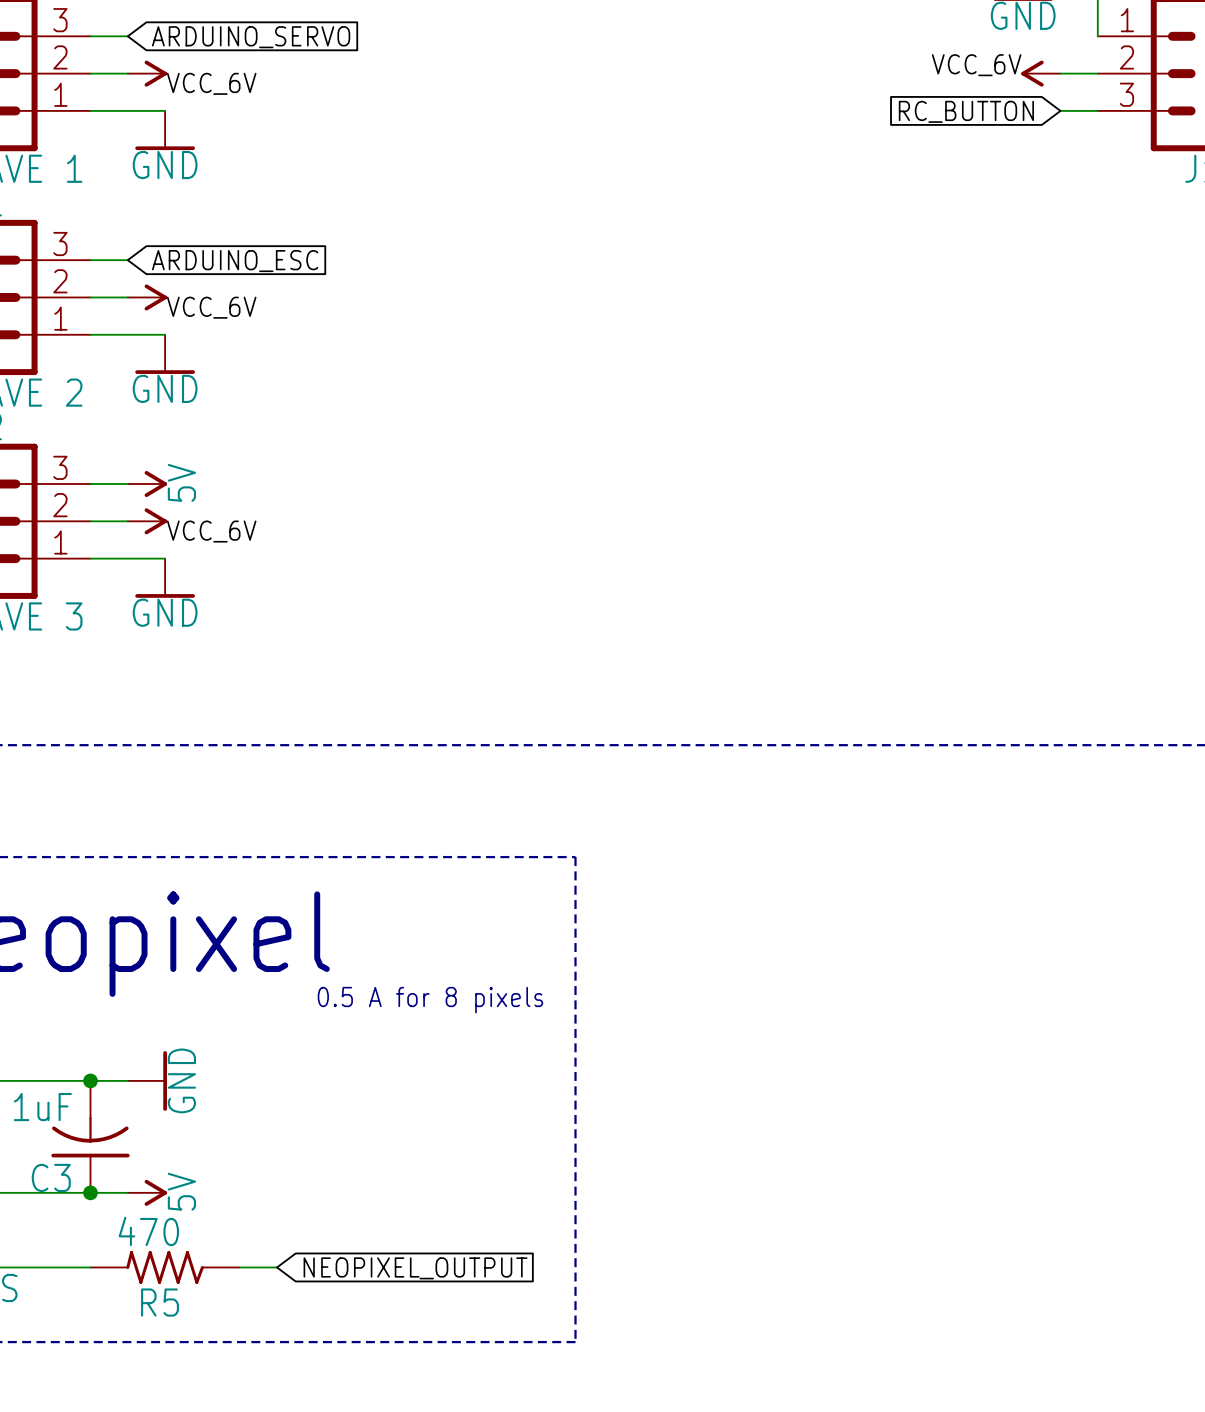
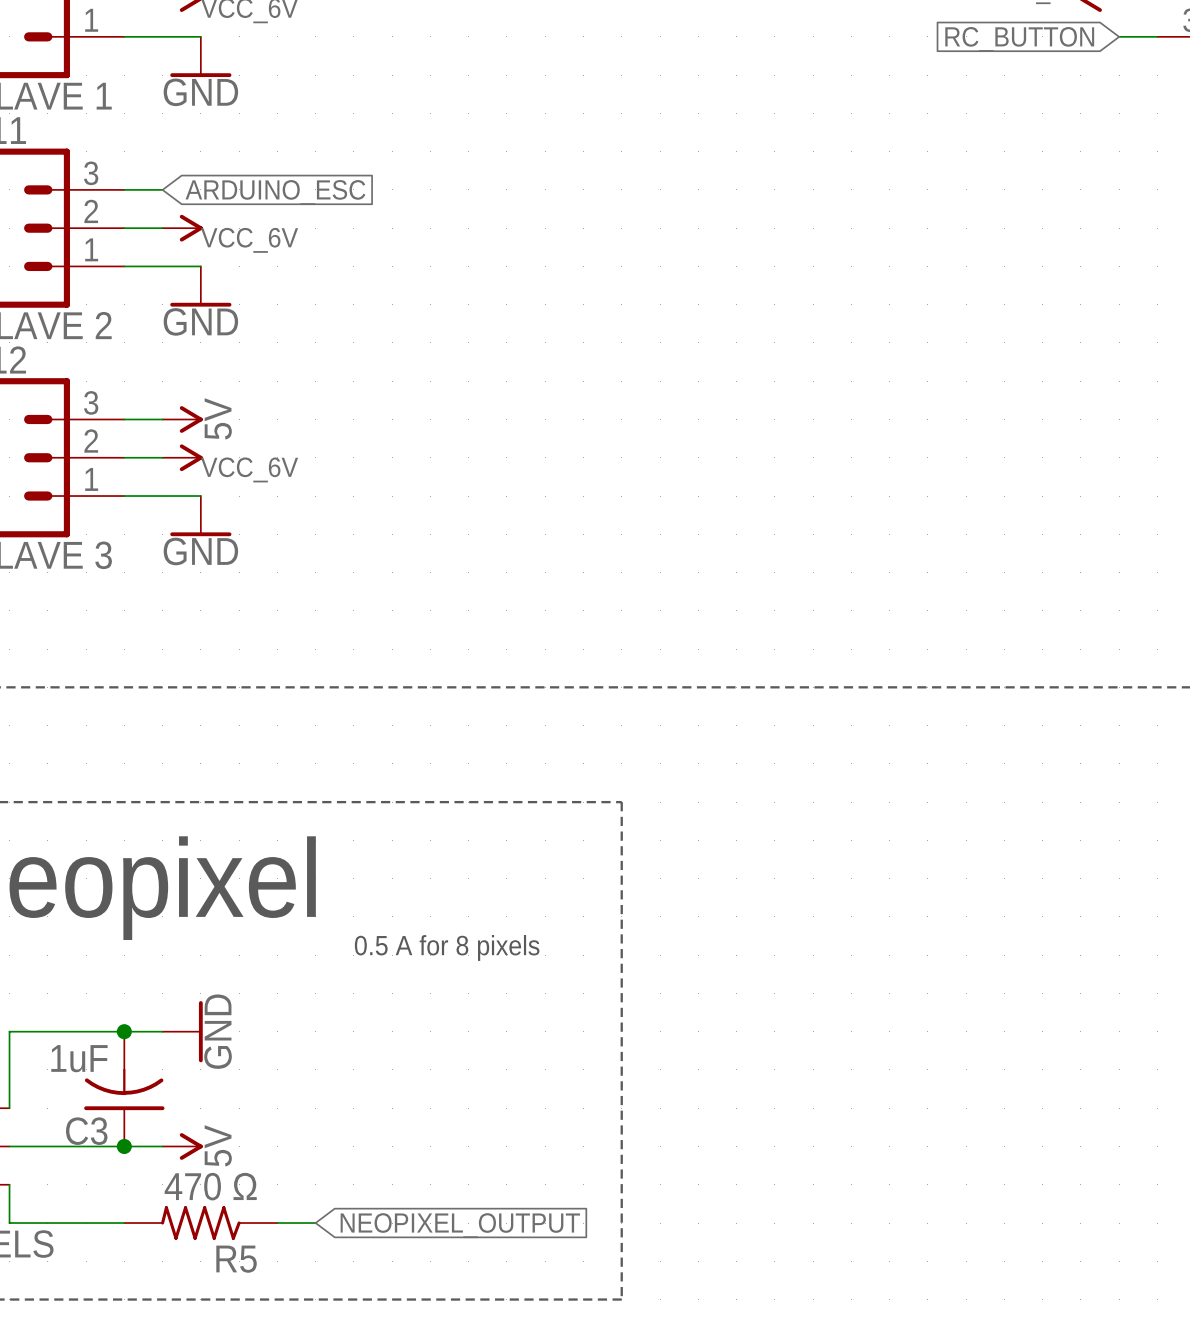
R5 value: 470 (148, 1231) -> 470 Ω (210, 1186)
R5 name position: R5 (160, 1302) -> R5 (236, 1259)

